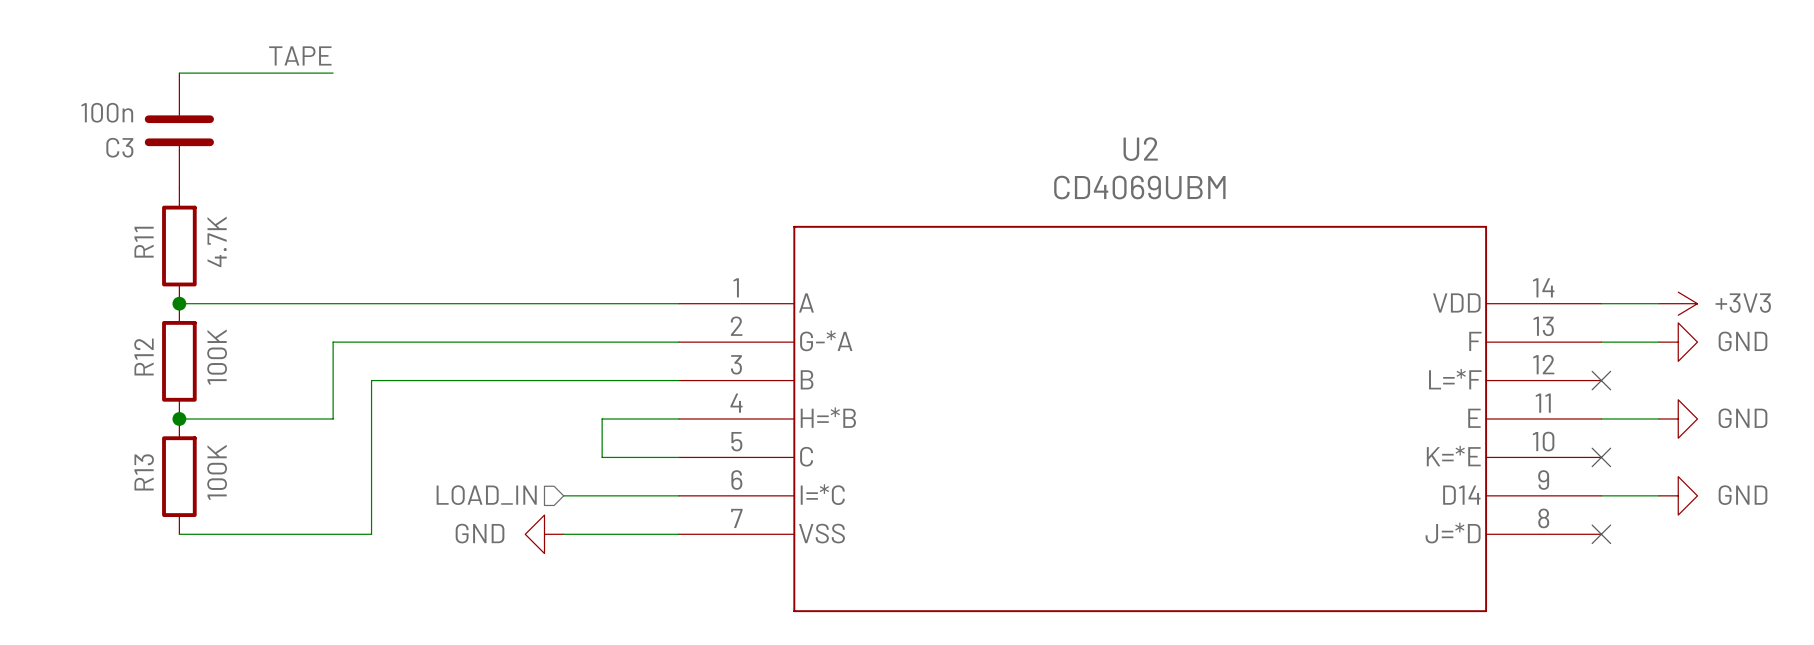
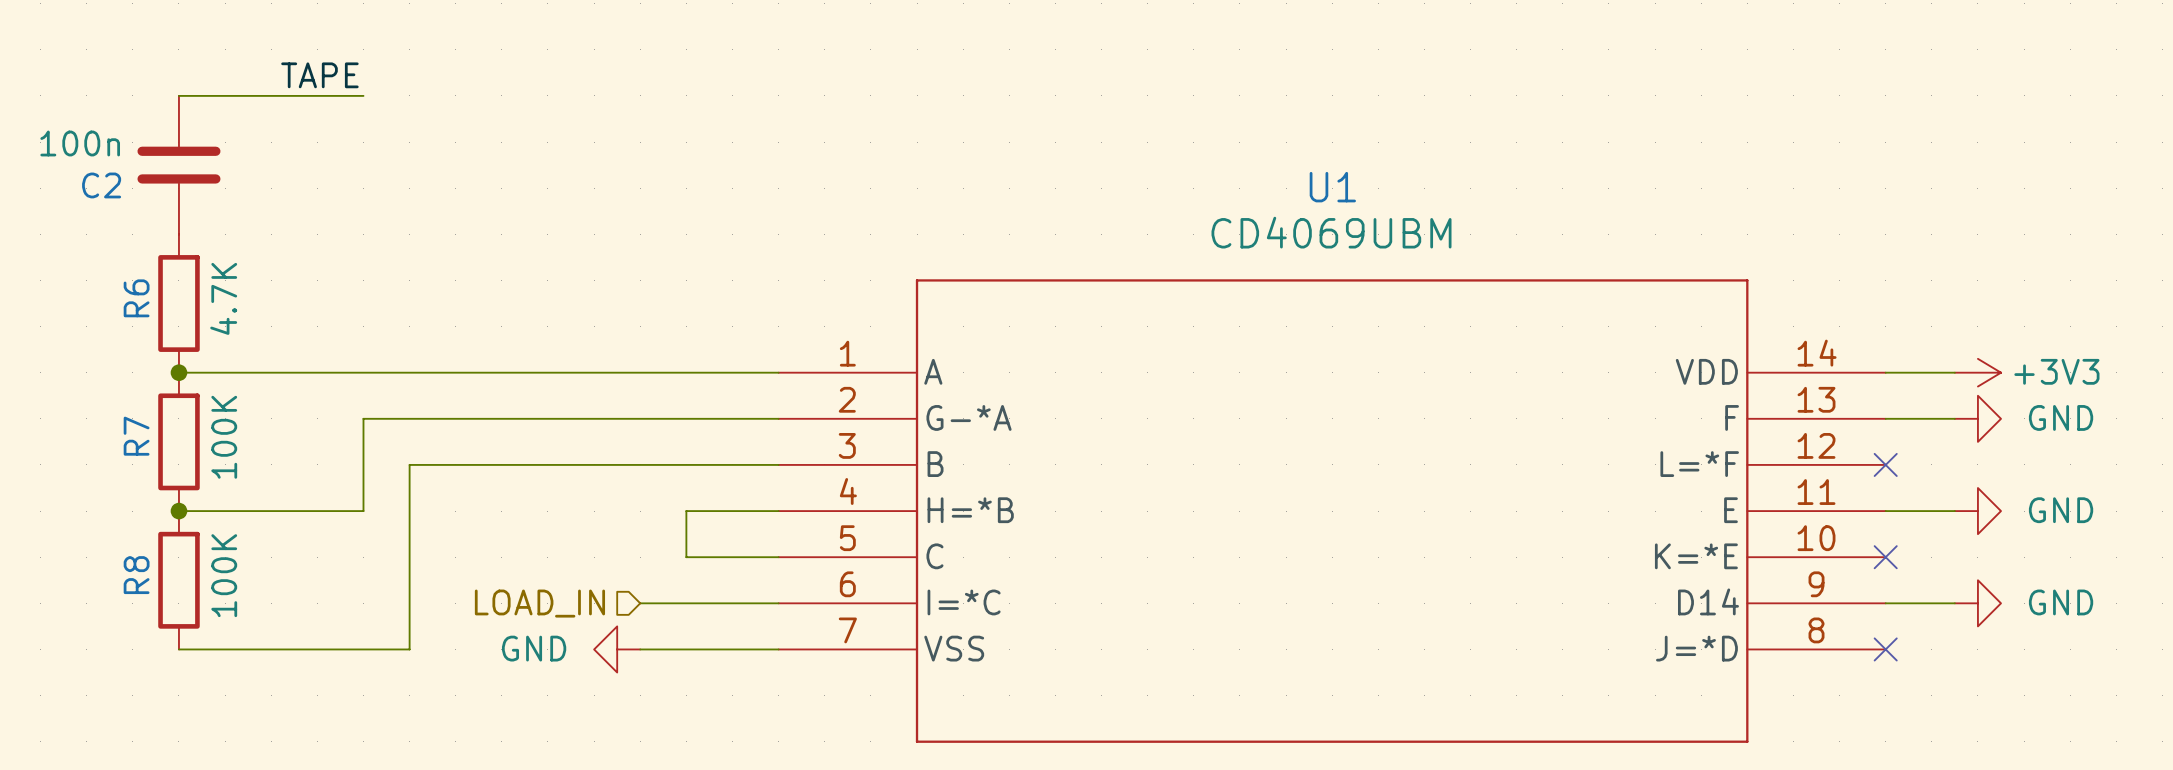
C3 name: C3 (119, 147) -> C2 (101, 185)
U2 name: U2 (1140, 149) -> U1 (1332, 187)
R11 name: R11 (144, 242) -> R6 (136, 298)
R12 name: R12 (143, 357) -> R7 (136, 436)
R13 name: R13 (144, 472) -> R8 (136, 575)

